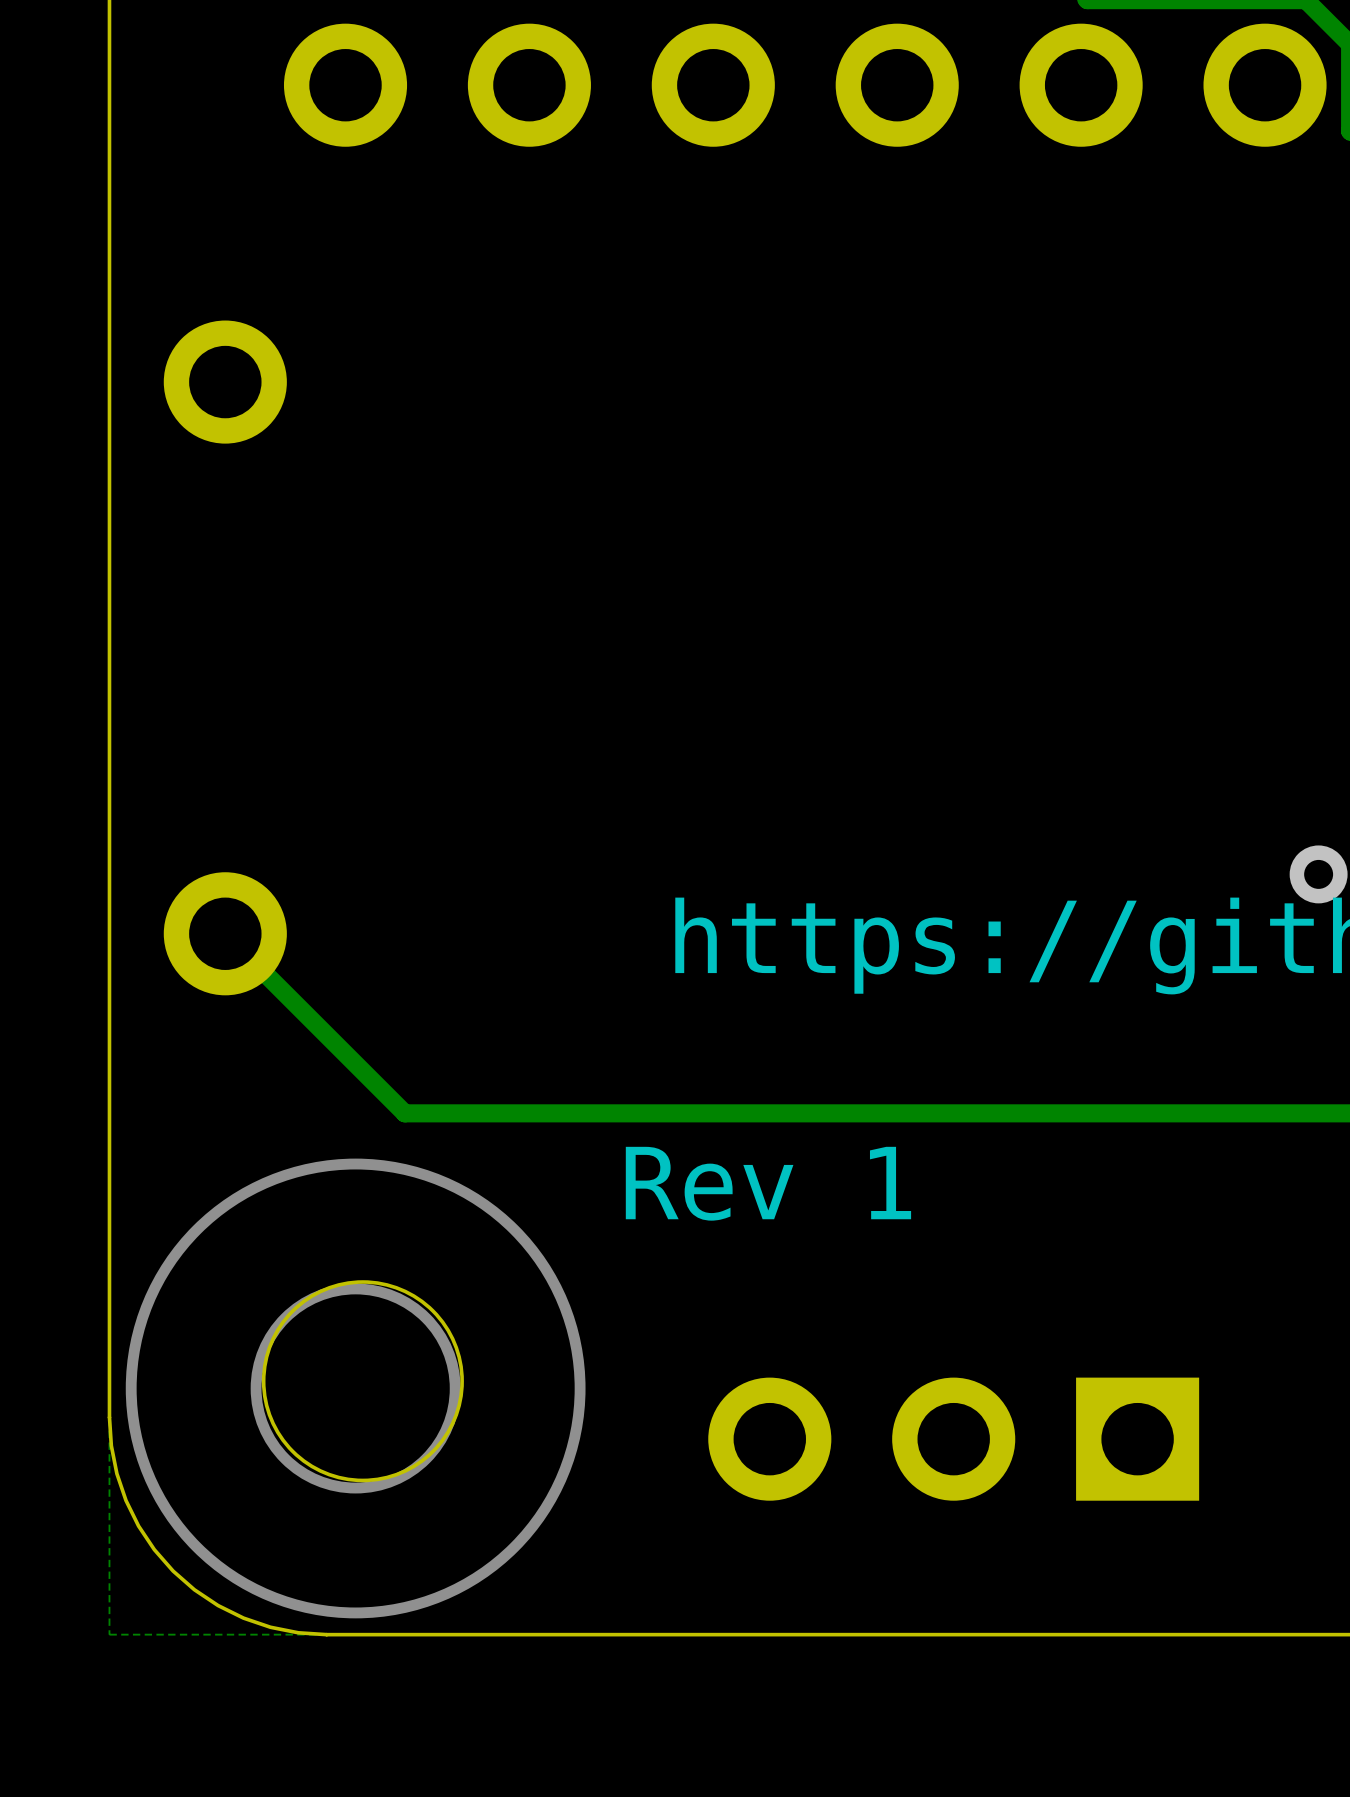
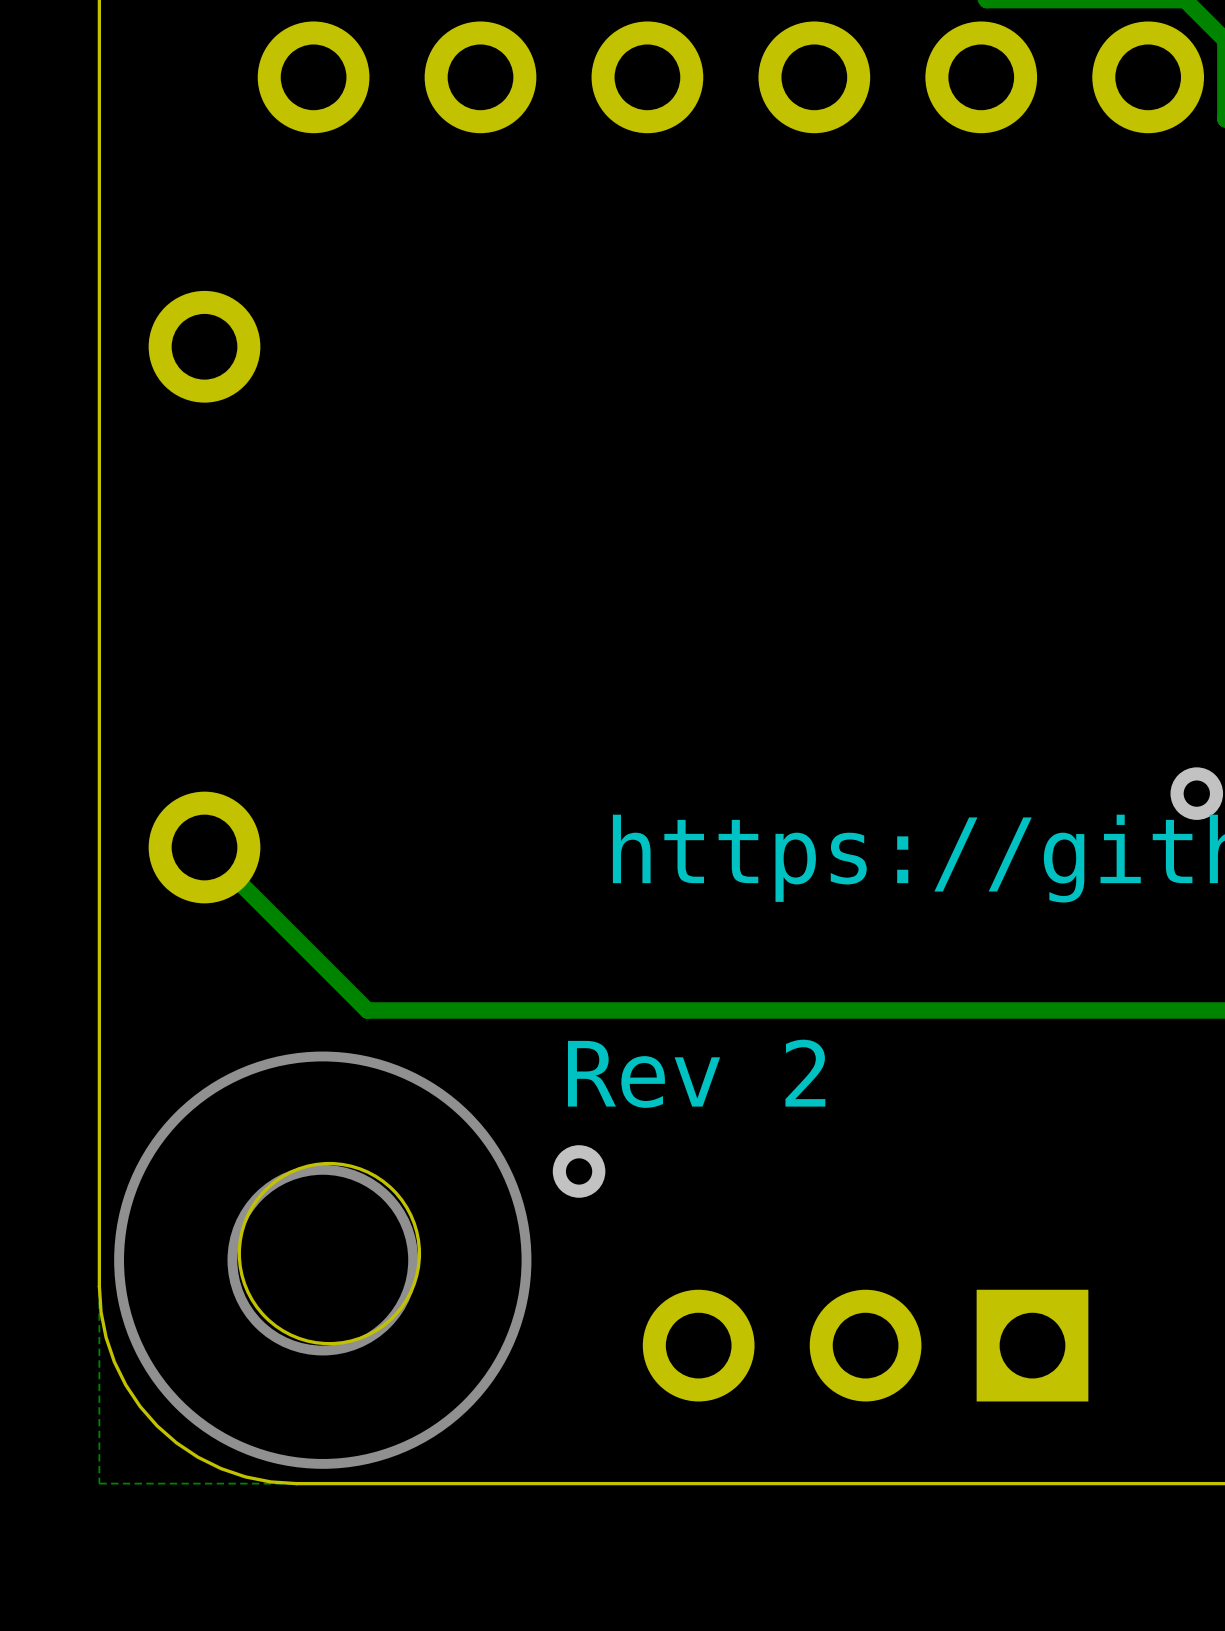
text: Rev 1 (768, 1183) -> Rev 2 (696, 1073)
via: none -> (579, 1171)
part position: (953, 1439) -> (865, 1345)

